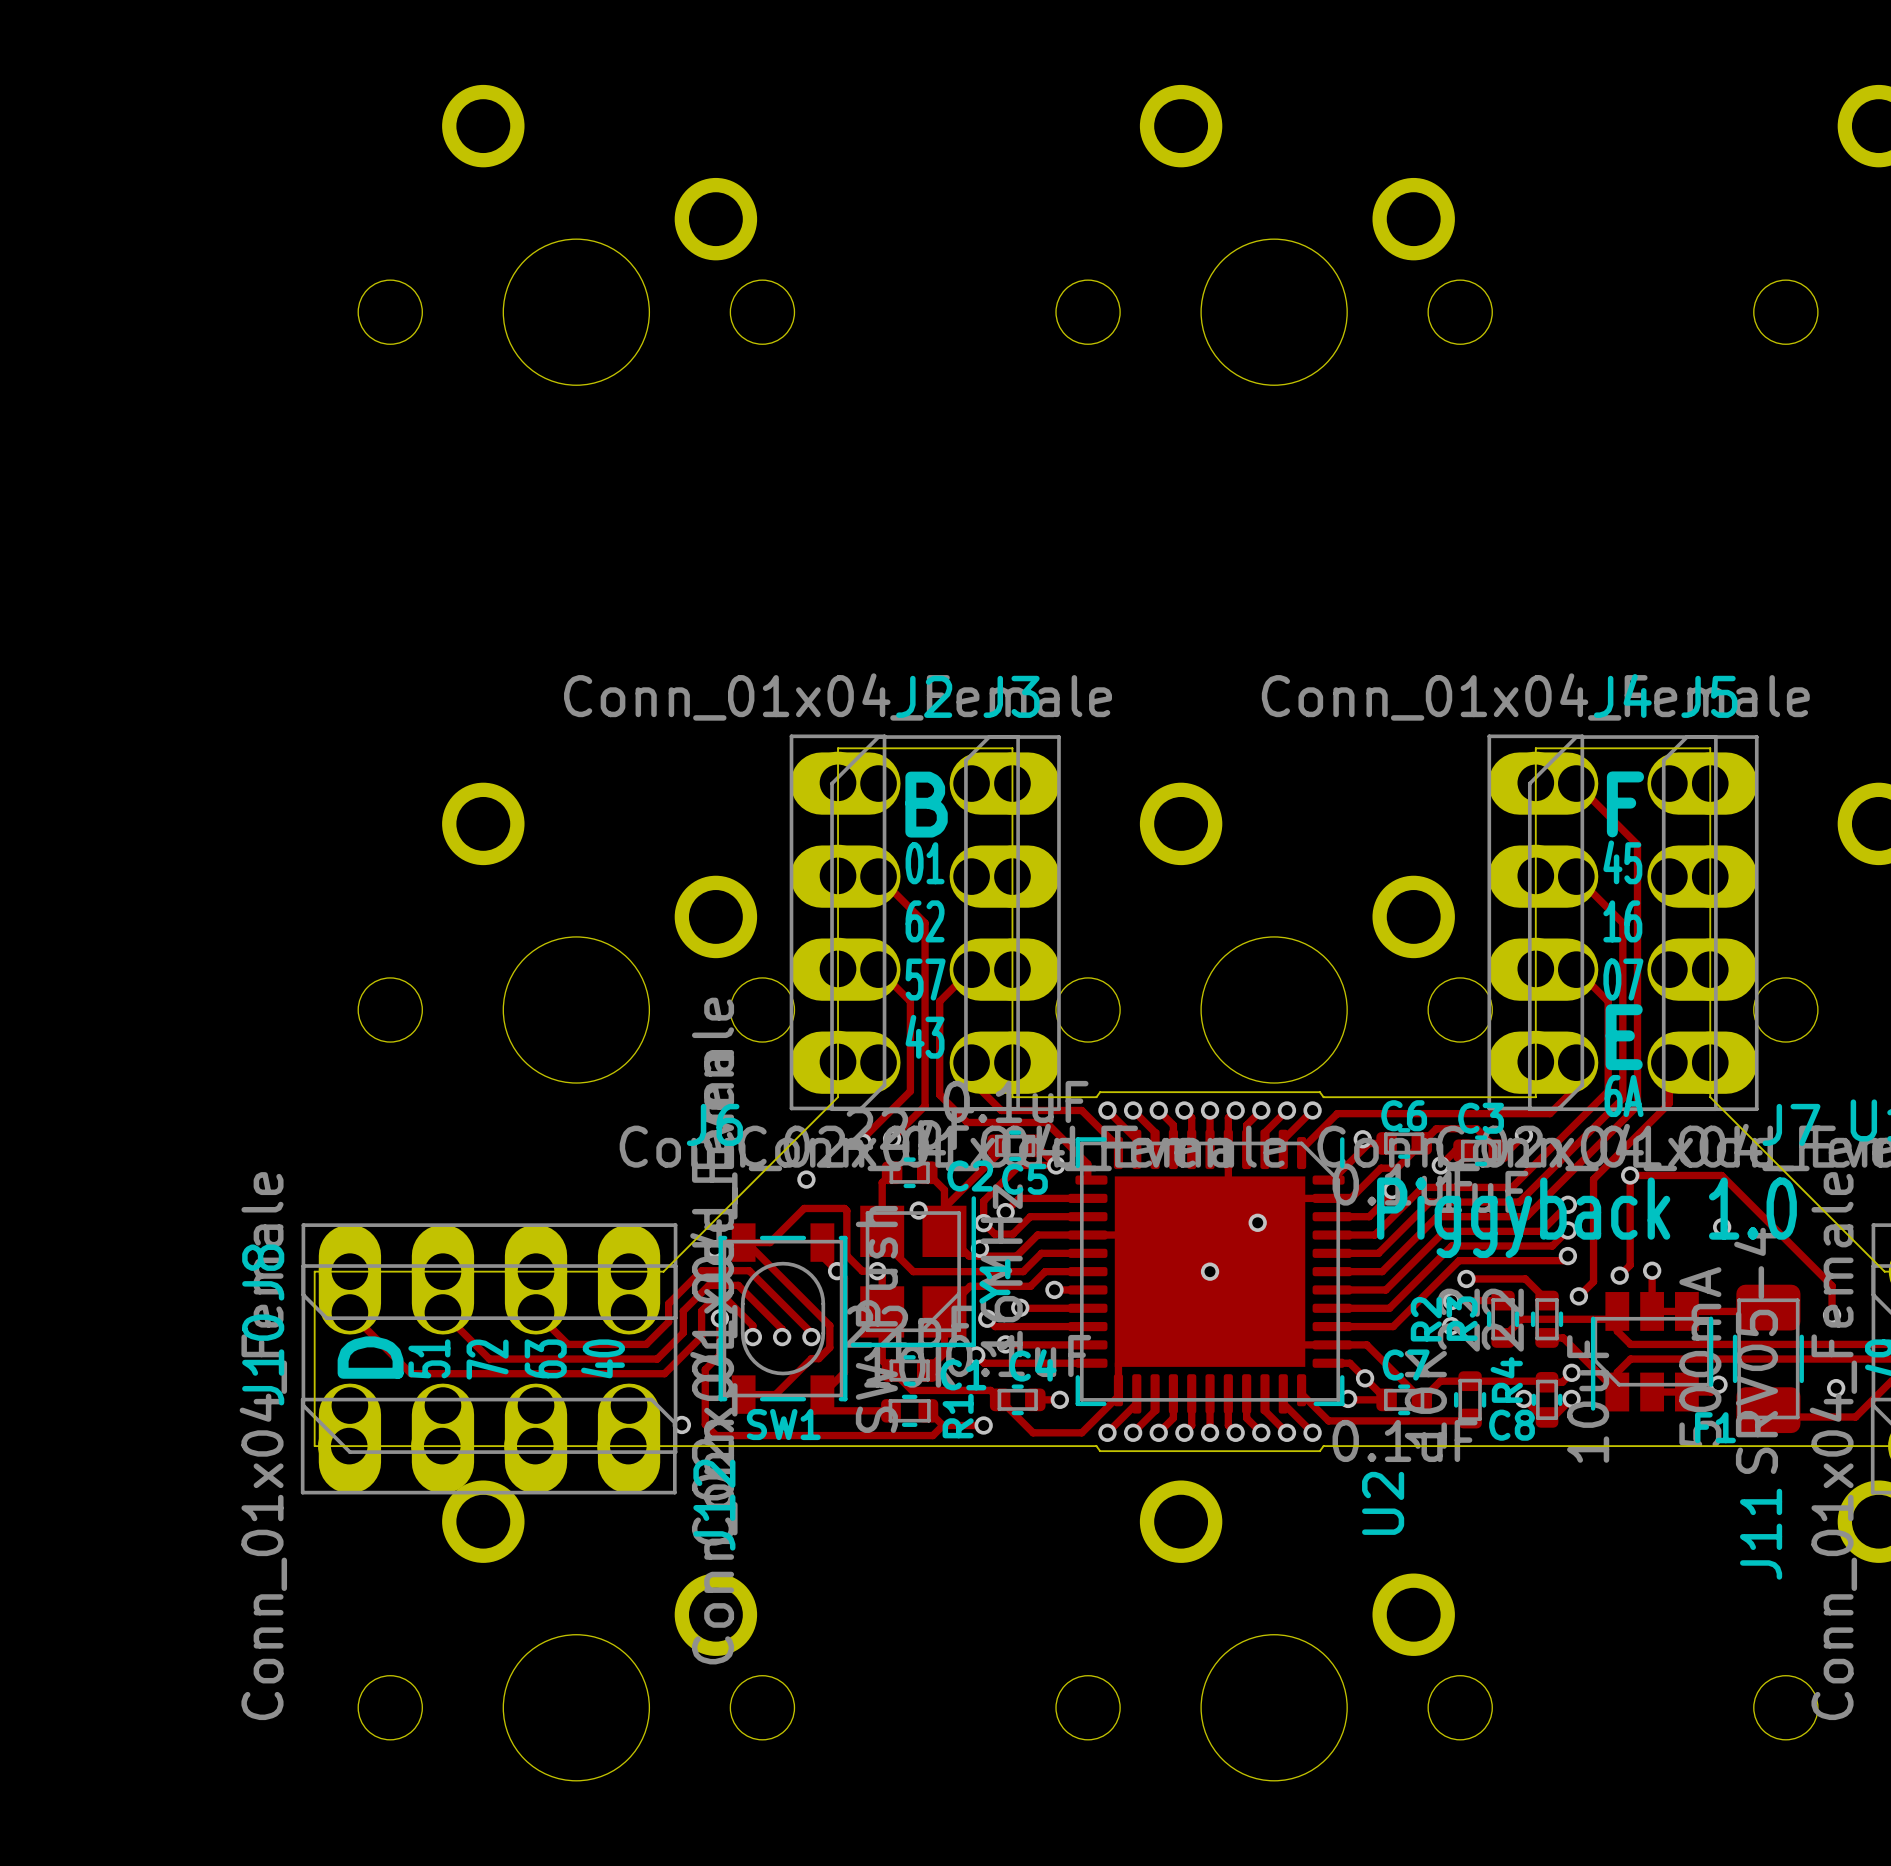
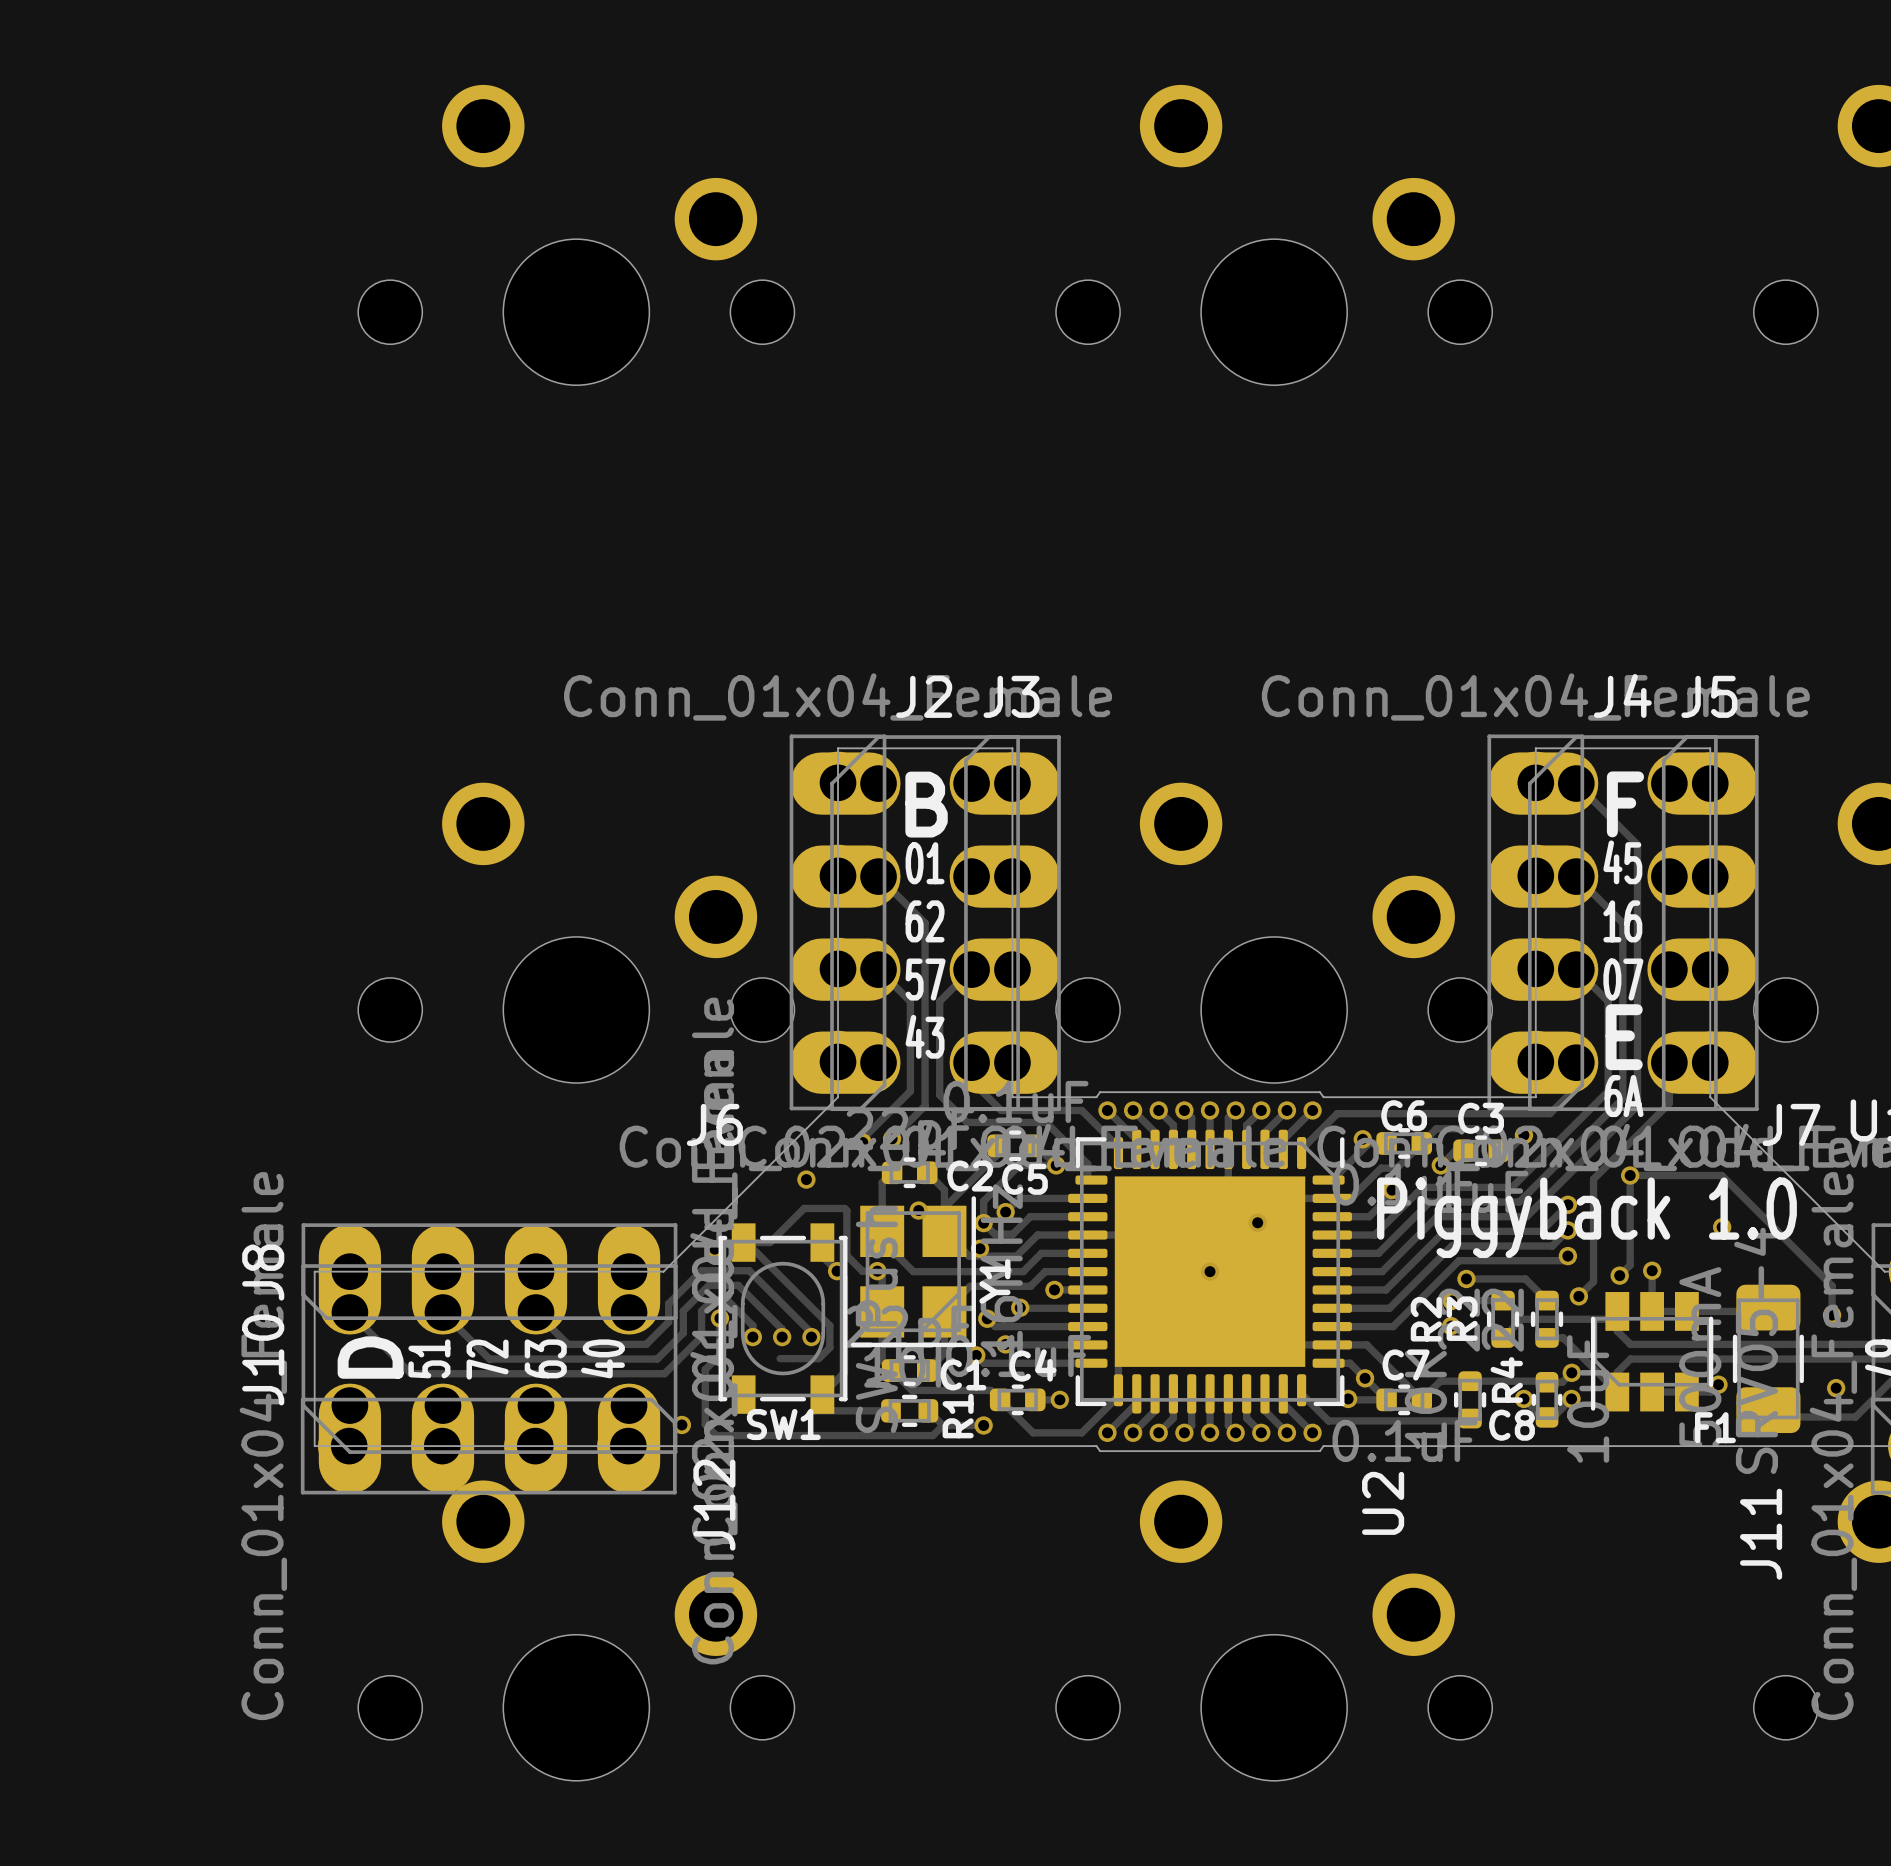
track: (811, 1358) (775, 1394) (743, 1394) -> (811, 1358) (780, 1358)

